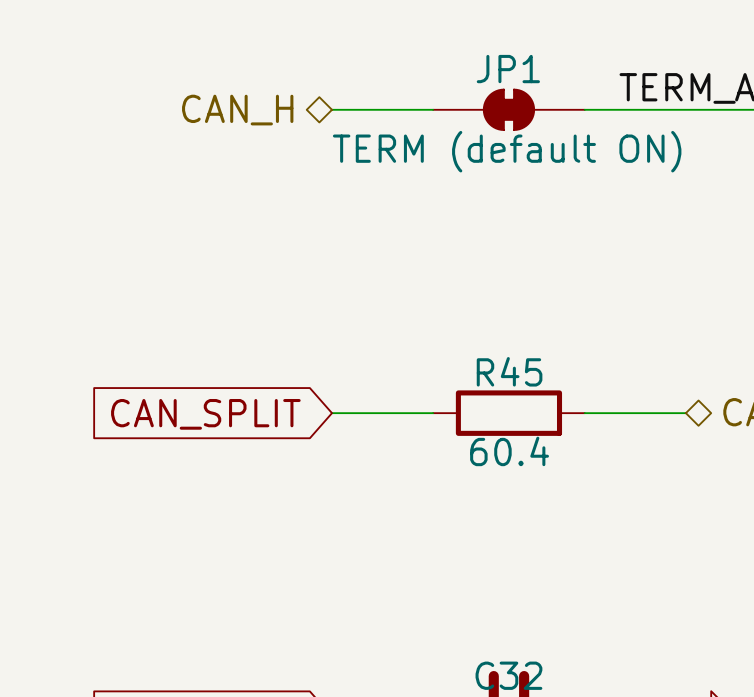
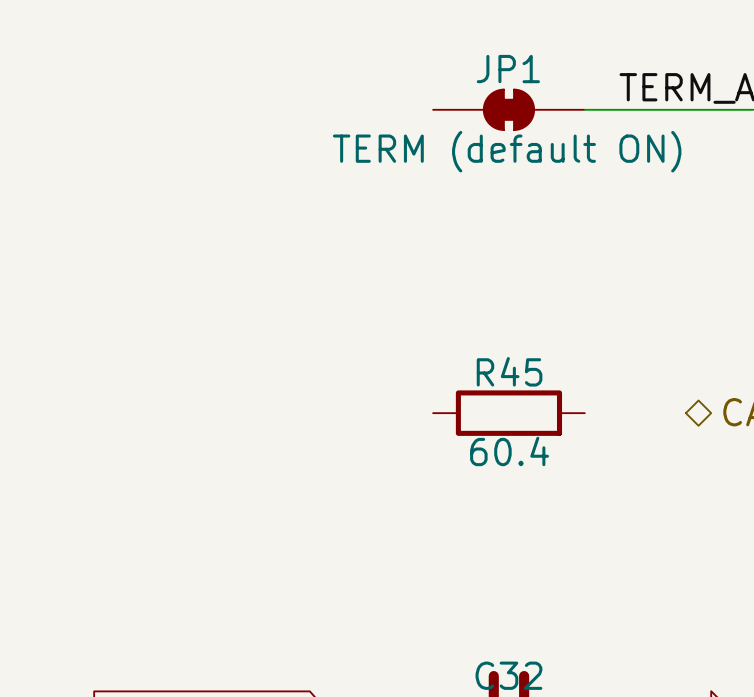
wire: (332, 109) (433, 109) -> none
hierarchical label: CAN_H (237, 110) -> none
wire: (332, 413) (433, 413) -> none
wire: (584, 413) (685, 413) -> none
global label: CAN_SPLIT (205, 414) -> none

